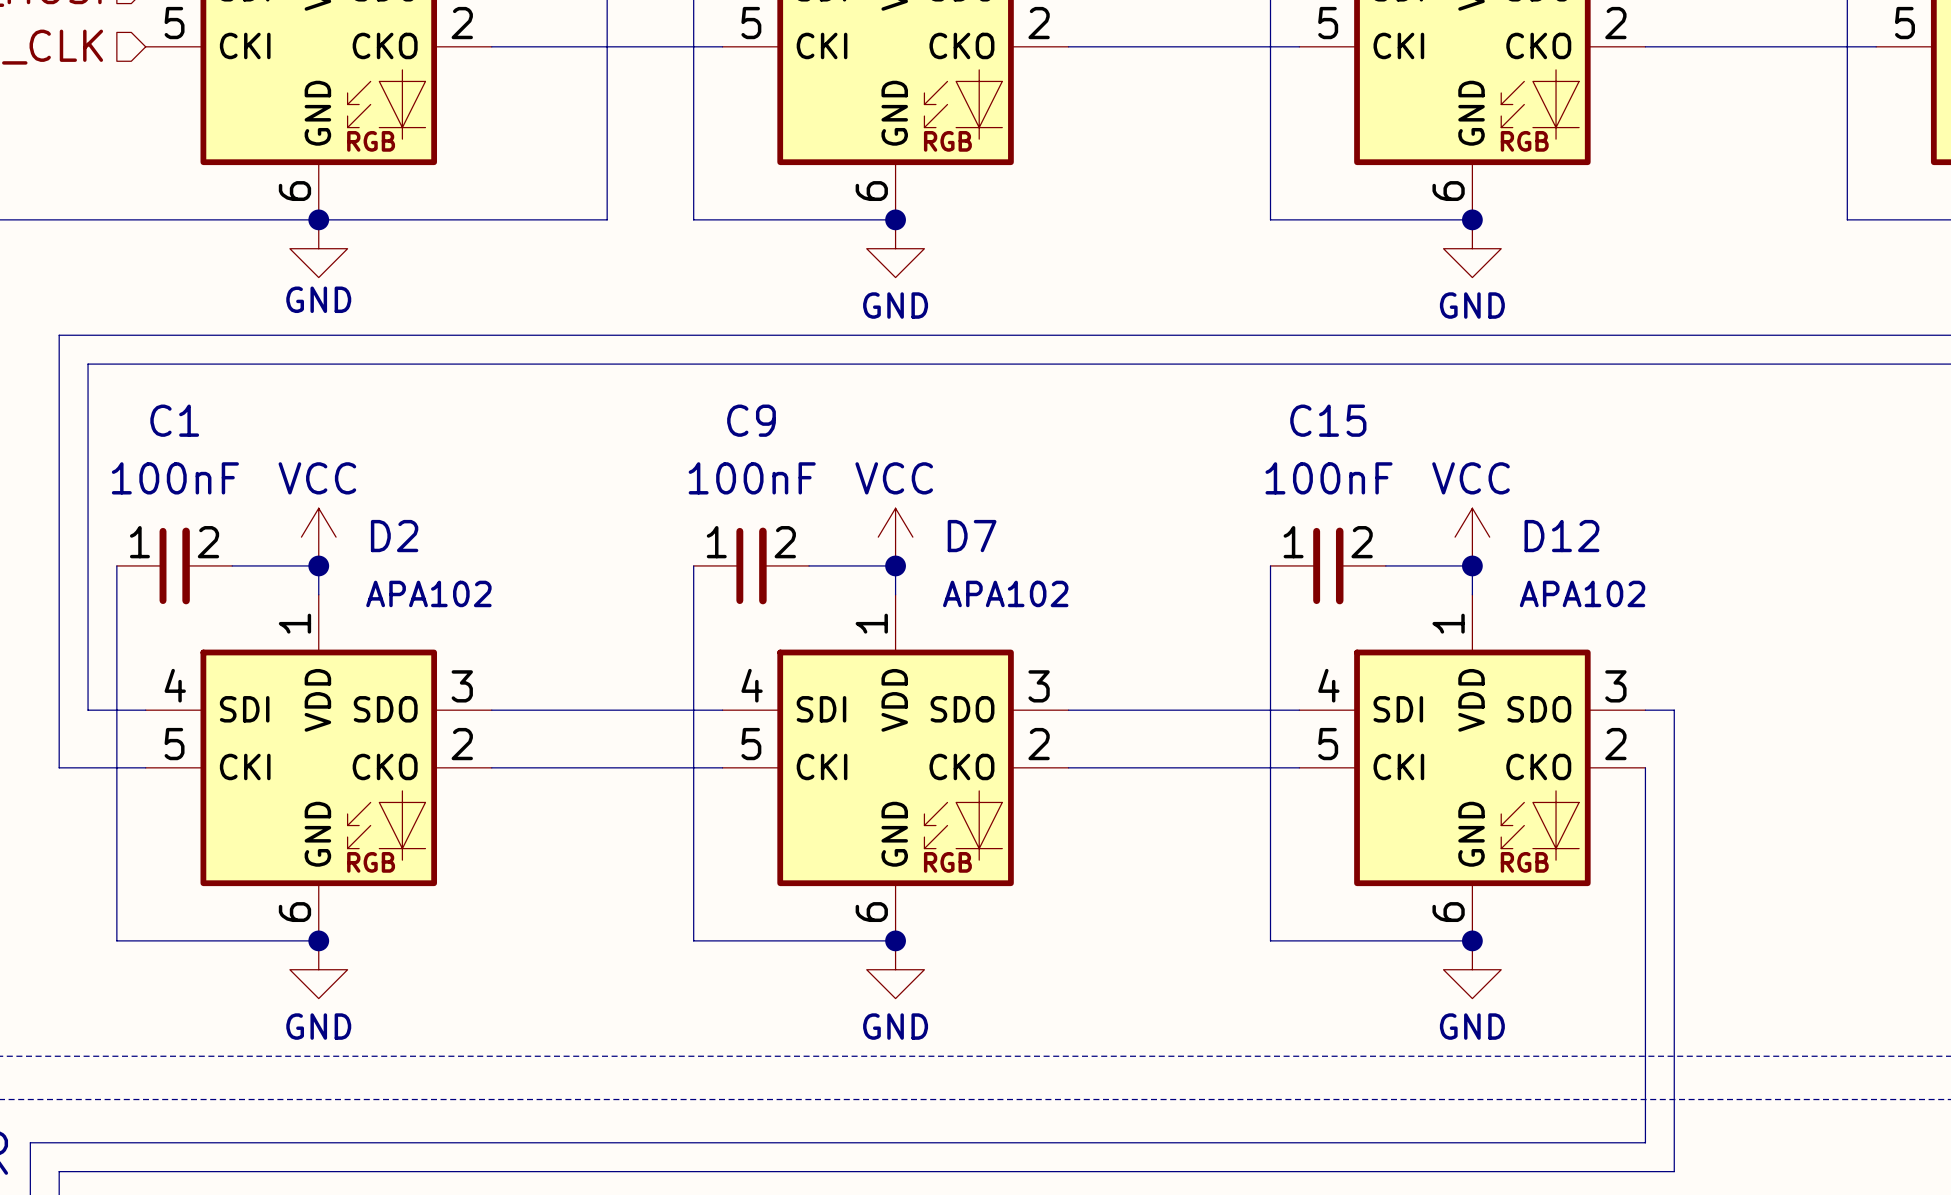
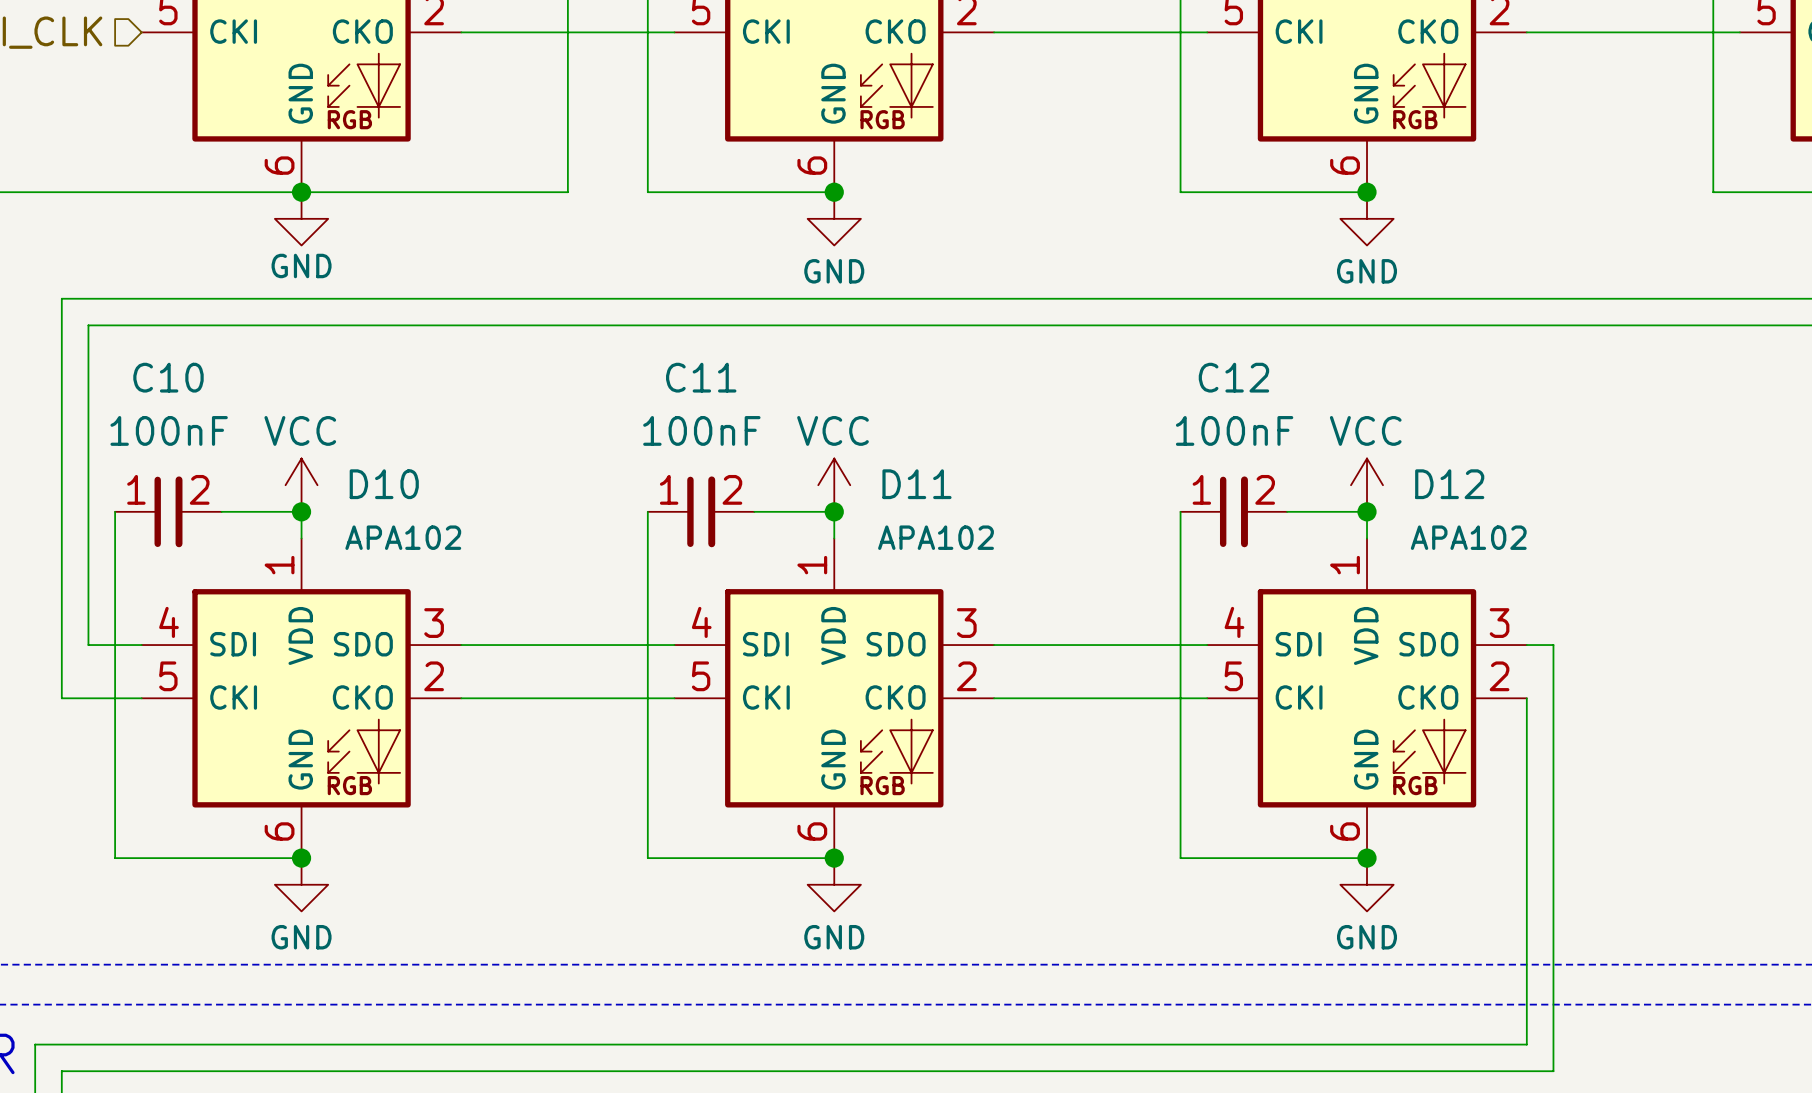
C1 name: C1 (174, 420) -> C10 (168, 377)
C9 name: C9 (751, 420) -> C11 (701, 377)
C15 name: C15 (1328, 420) -> C12 (1233, 377)
D2 name: D2 (394, 536) -> D10 (384, 484)
D7 name: D7 (972, 536) -> D11 (916, 484)

